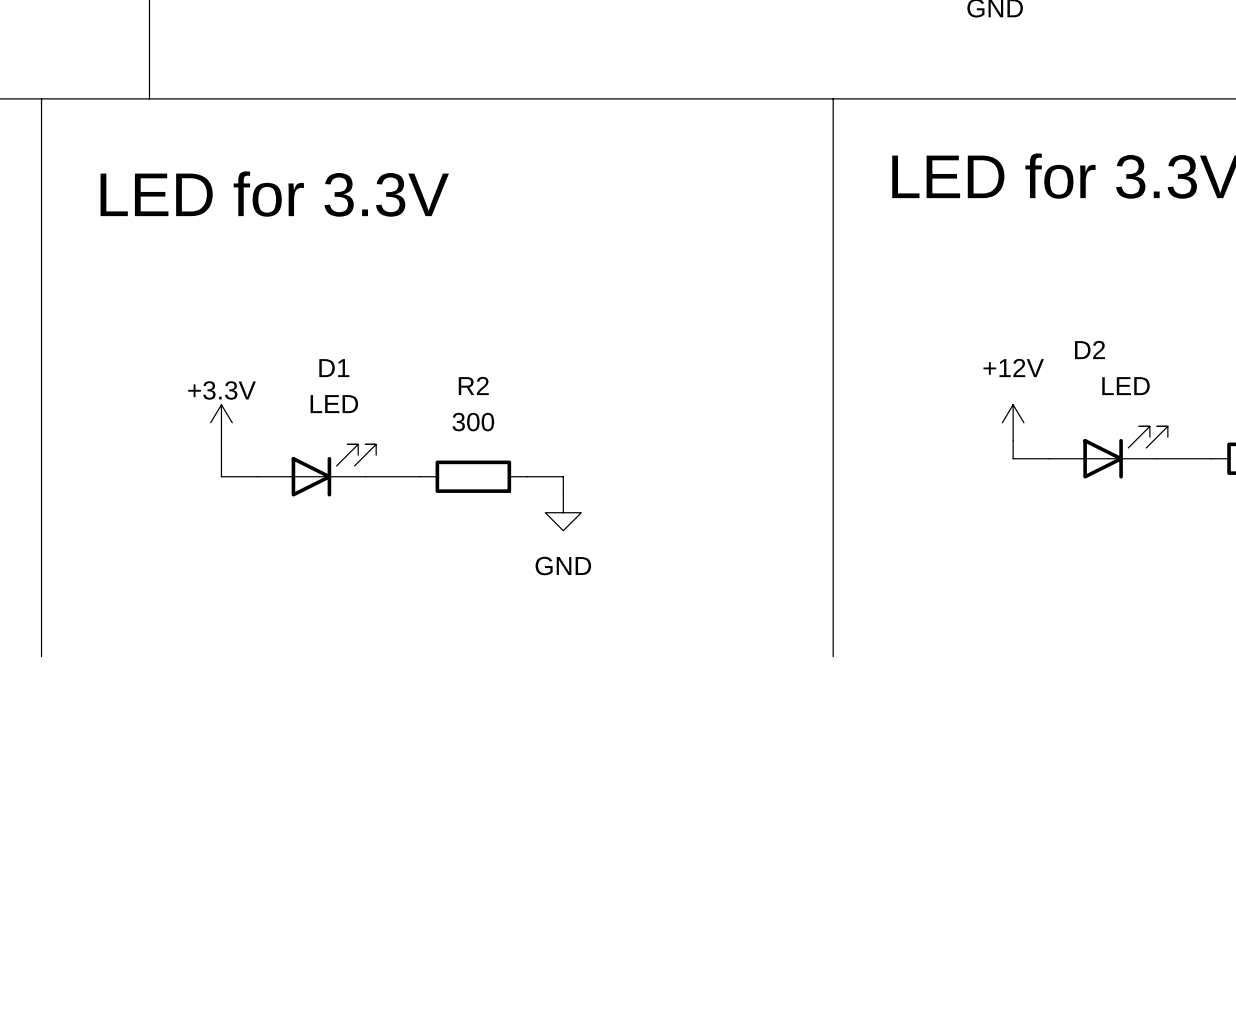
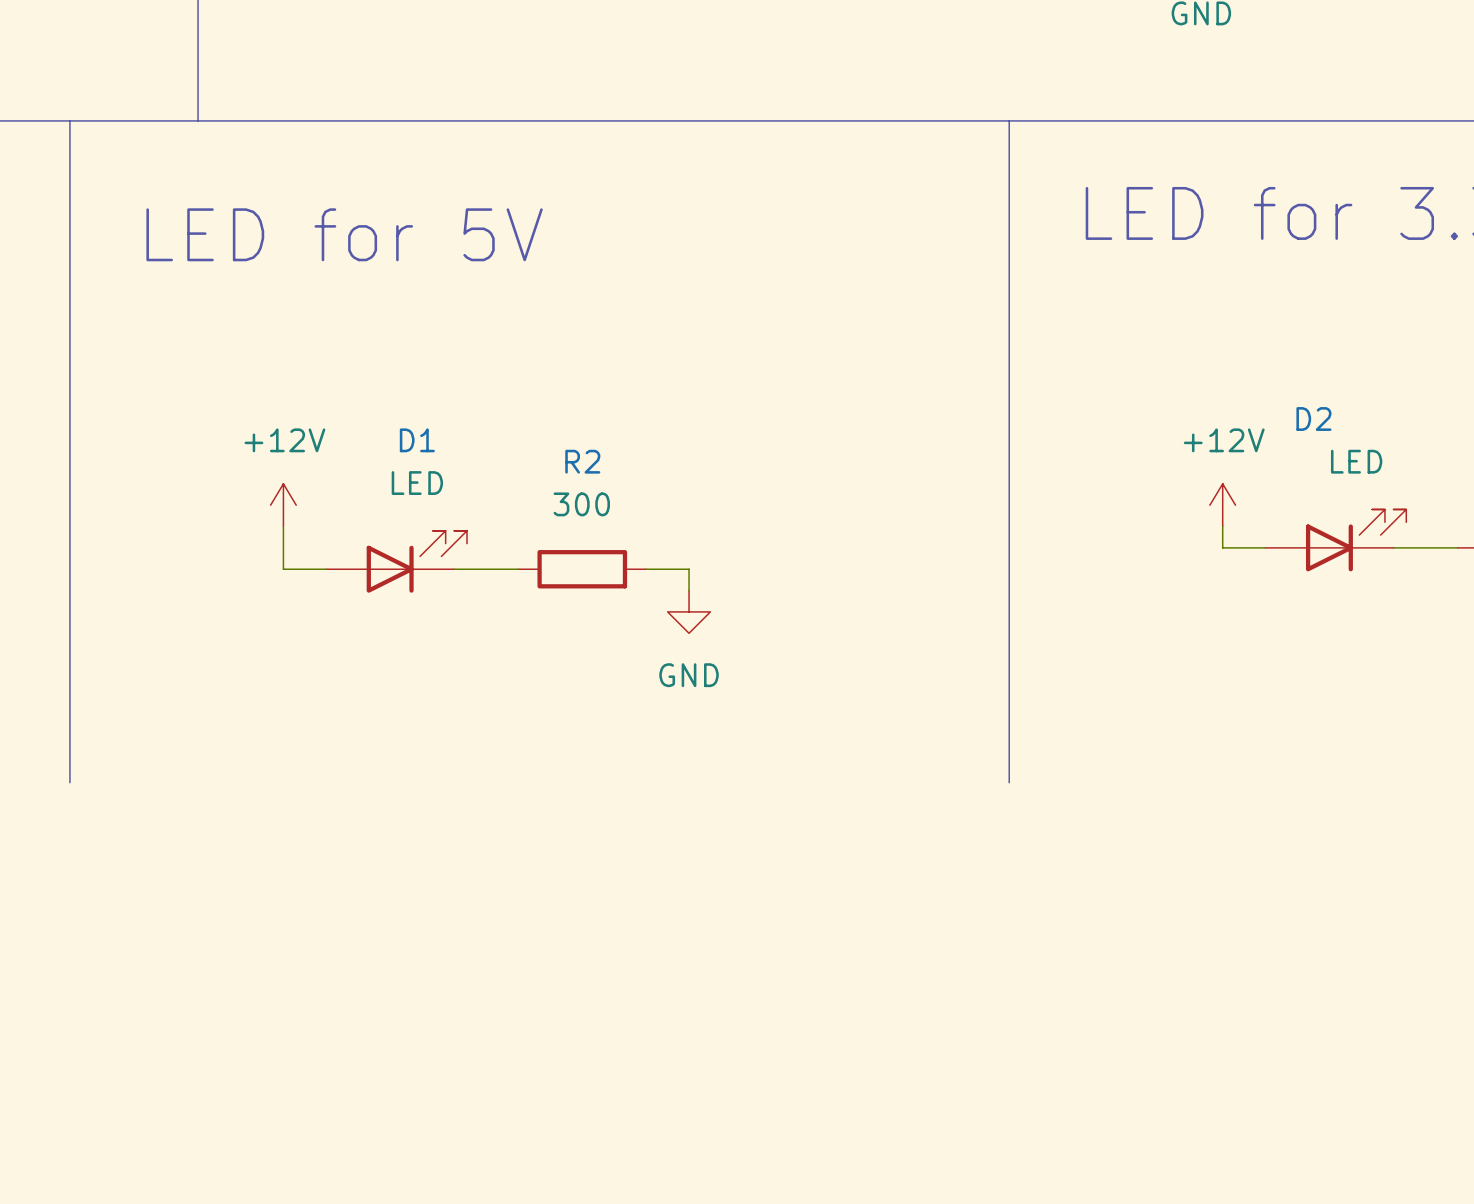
text: LED for 3.3V (274, 194) -> LED for 5V (344, 234)
power symbol: +3.3V (221, 422) -> +12V (283, 505)

